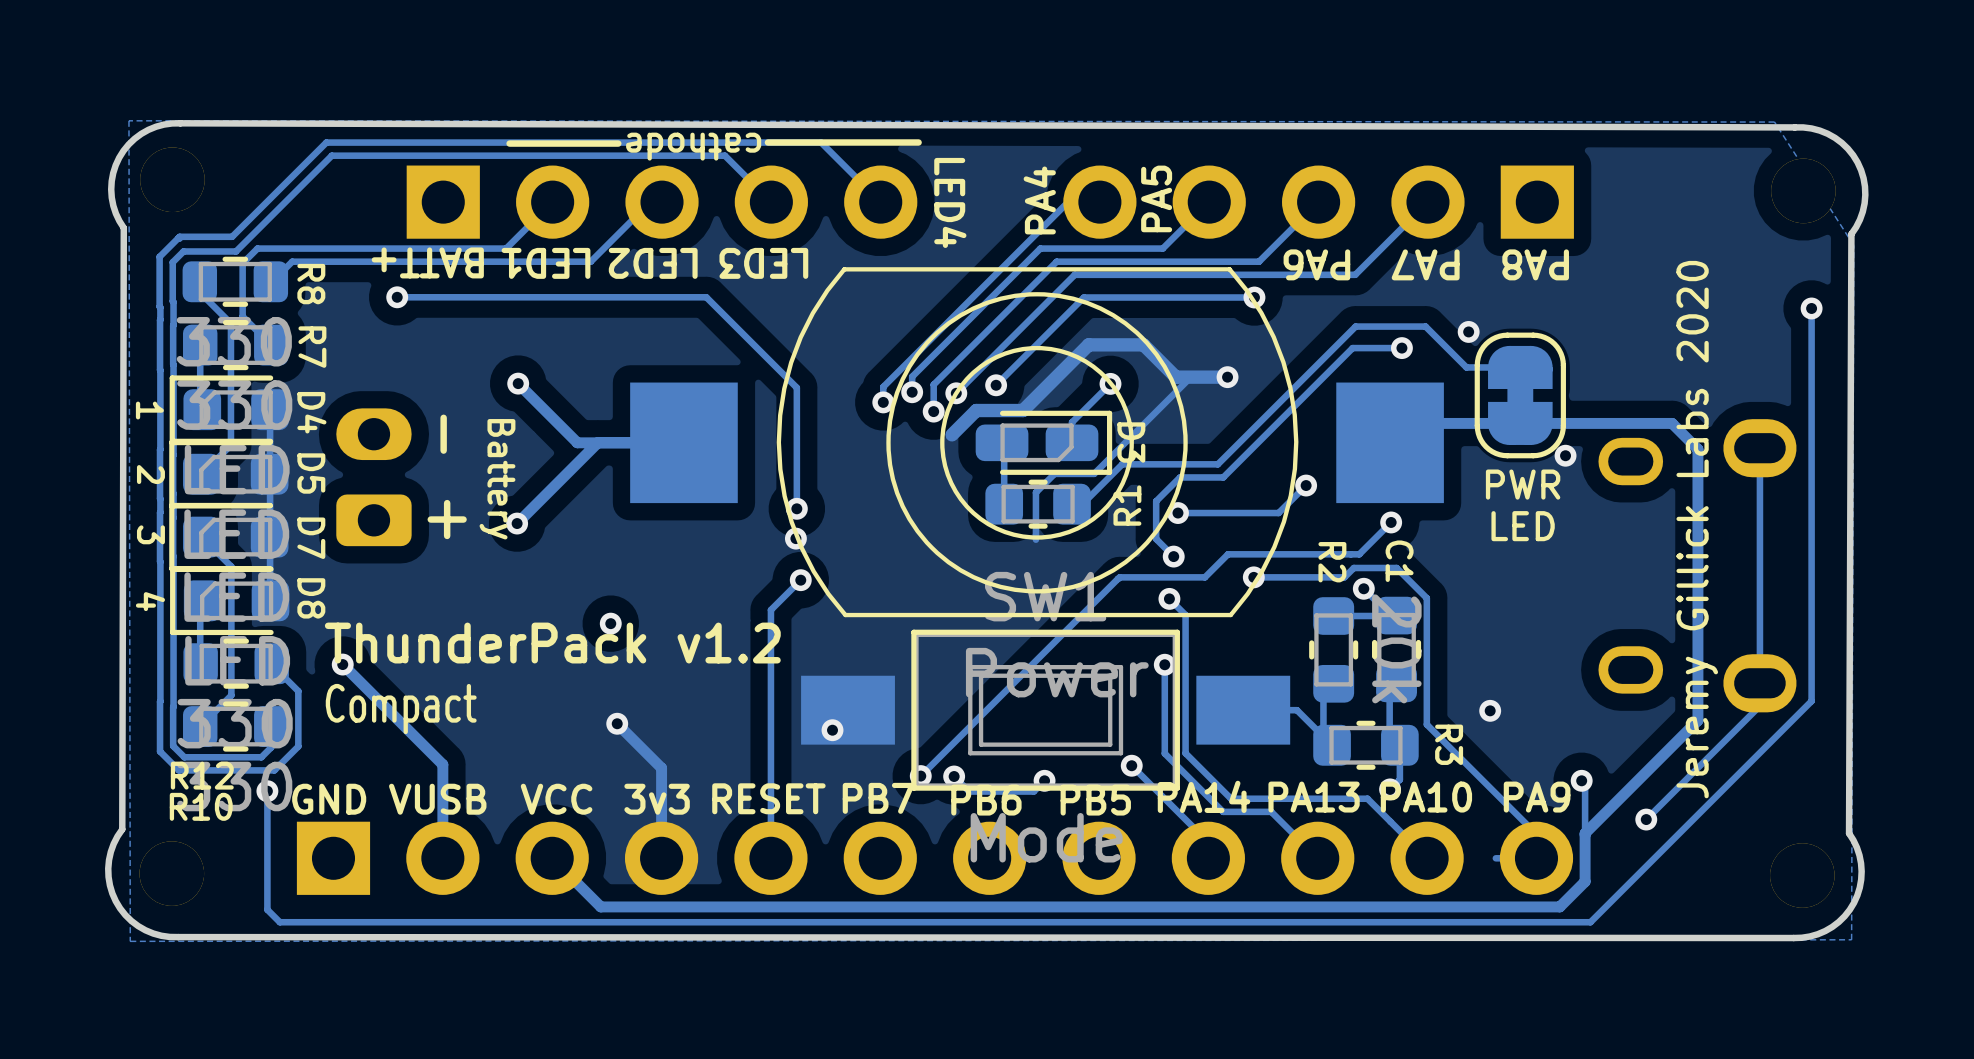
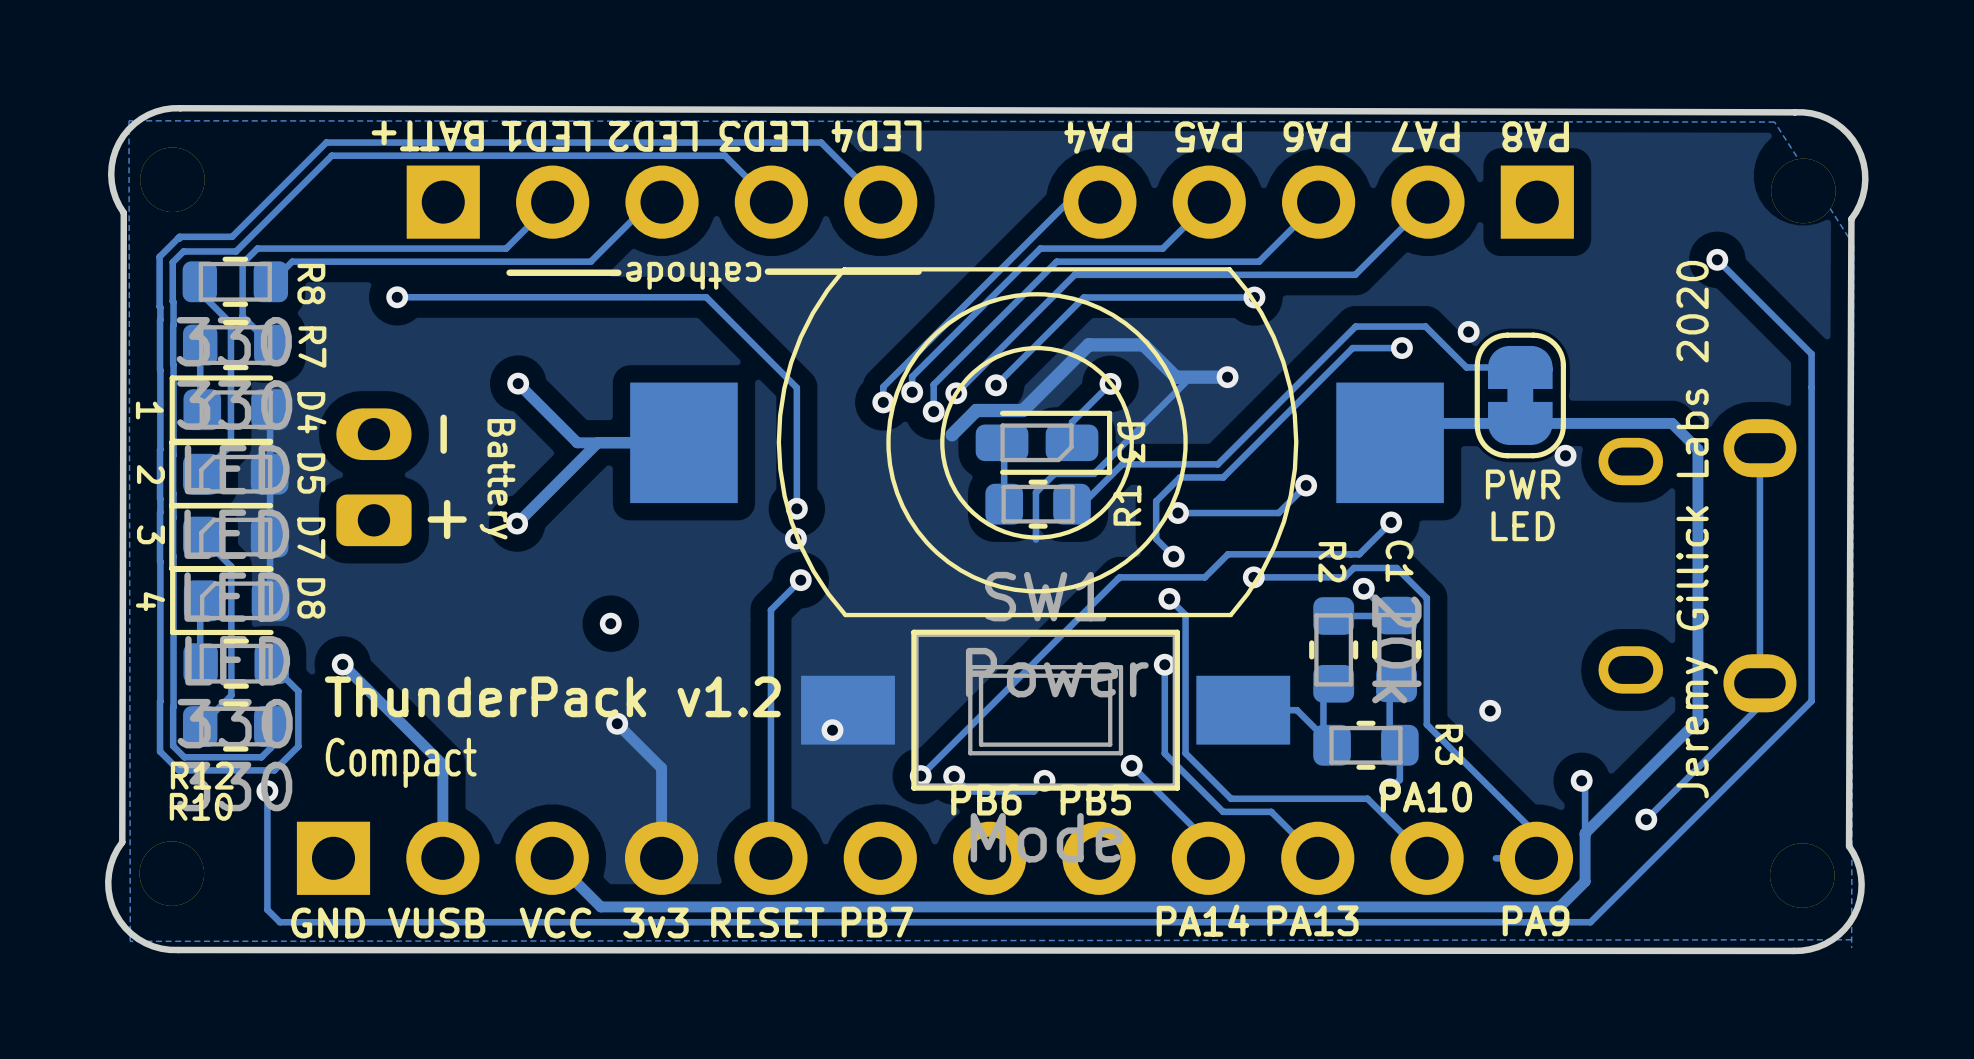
board edge: (180, 123) (1803, 127) (1827, 133) (1841, 142) (1853, 155) (1861, 170) (1865, 195) (1859, 219) (1851, 234) (1849, 833) (1859, 855) (1861, 871) (1859, 887) (1854, 902) (1844, 916) (1832, 926) (1809, 936) (1793, 938) (178, 937) (161, 935) (145, 930) (131, 920) (120, 908) (112, 893) (108, 876) (110, 851) (122, 829) (123, 227) (115, 213) (111, 189) (113, 173) (119, 157) (134, 138) (156, 126) (180, 123) -> (180, 108) (1803, 112) (1827, 118) (1841, 127) (1853, 140) (1863, 163) (1865, 179) (1859, 204) (1851, 219) (1849, 846) (1859, 868) (1861, 884) (1859, 900) (1854, 915) (1844, 929) (1832, 939) (1809, 949) (1793, 950) (178, 950) (161, 948) (145, 943) (131, 933) (120, 921) (112, 906) (108, 889) (110, 864) (122, 842) (123, 212) (115, 198) (111, 174) (115, 150) (123, 135) (134, 123) (156, 111) (180, 108)
line: (918, 142) (767, 142) -> (918, 271) (767, 271)
line: (618, 143) (509, 143) -> (618, 272) (509, 272)
text position: cathode (693, 146) -> cathode (693, 275)
text rotation: 0° (1156, 198) -> 90° counterclockwise (1208, 137)
text rotation: 0° (1039, 200) -> 90° counterclockwise (1098, 137)
text rotation: 0° (950, 202) -> 90° clockwise (876, 136)
text position: BATT+ (427, 262) -> BATT+ (427, 135)
text position: LED1 (546, 263) -> LED1 (546, 136)
text position: LED2 (653, 263) -> LED2 (653, 136)
text position: LED3 (763, 263) -> LED3 (763, 136)
text position: PA6 (1316, 264) -> PA6 (1316, 136)
text position: PA7 (1425, 264) -> PA7 (1425, 136)
text position: PA8 (1535, 264) -> PA8 (1535, 136)
track: (1811, 308) (1811, 354) -> (1717, 259) (1811, 354)
via position: (1811, 308) -> (1717, 259)
text position: ThunderPack v1.2 (552, 643) -> ThunderPack v1.2 (552, 696)
text position: Compact (401, 709) -> Compact (401, 762)
text position: PA14 (1204, 796) -> PA14 (1202, 920)
text position: PA13 (1314, 797) -> PA13 (1312, 920)
text position: PA9 (1537, 797) -> PA9 (1536, 920)
text position: RESET (768, 798) -> RESET (767, 922)
text position: PB7 (878, 798) -> PB7 (877, 922)
text position: GND (329, 799) -> GND (328, 923)
text position: VUSB (437, 799) -> VUSB (436, 923)
text position: VCC (556, 799) -> VCC (555, 923)
text position: 3v3 (657, 799) -> 3v3 (656, 923)

